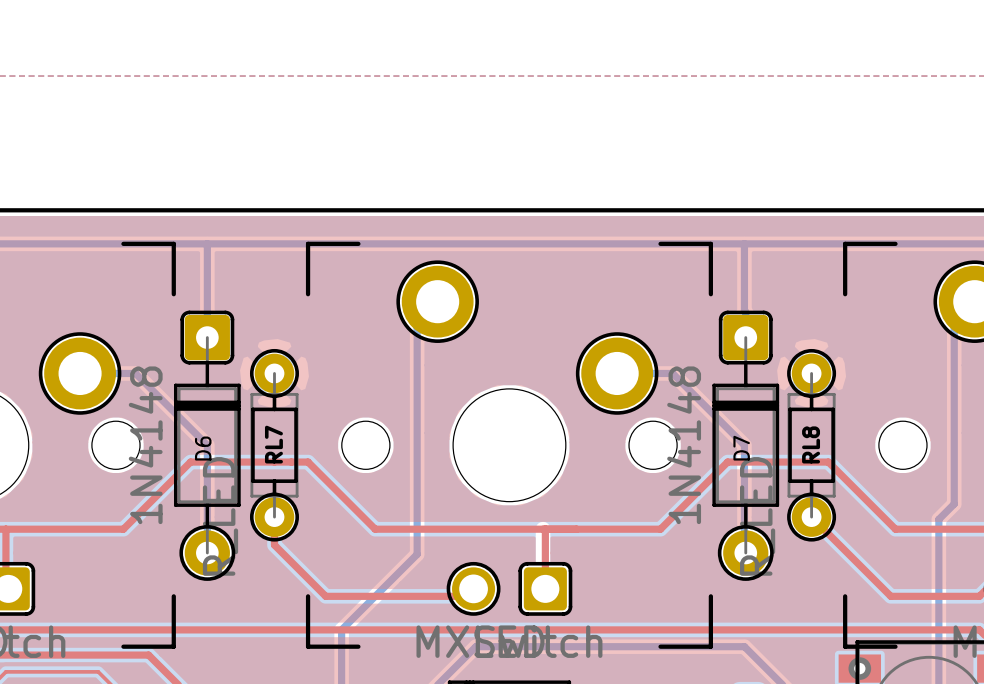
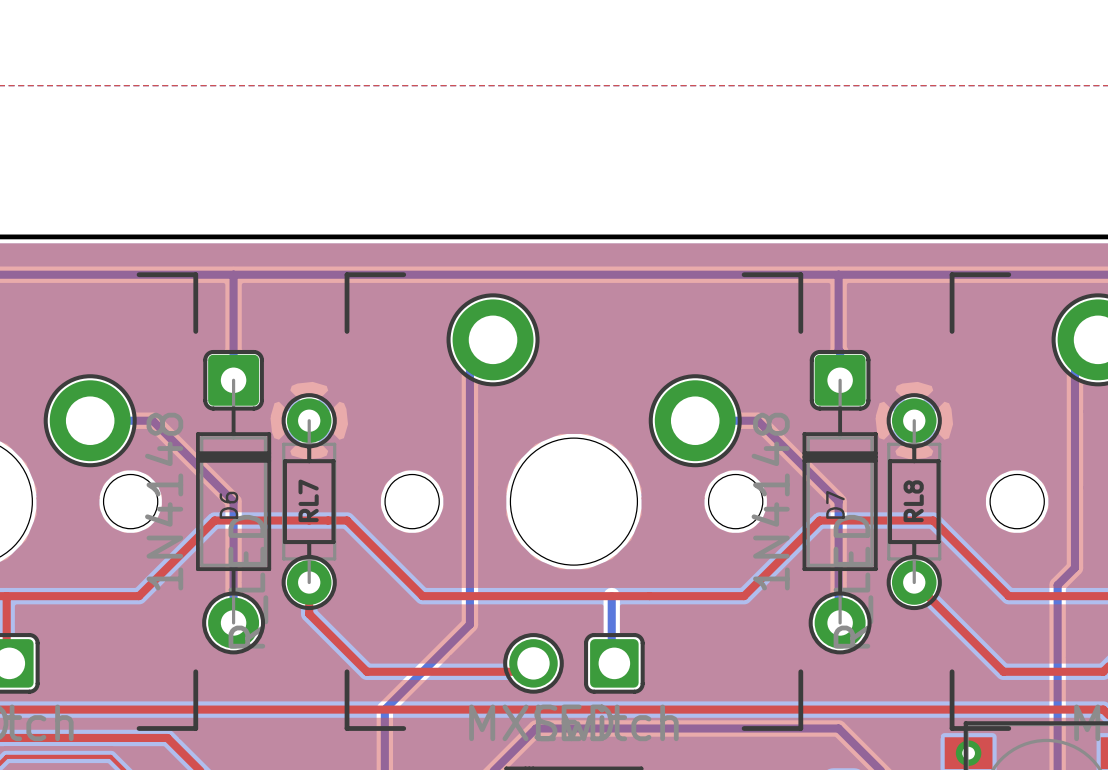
bottom track: none -> (611, 596) (611, 652)
top track: (545, 529) (545, 588) -> none

